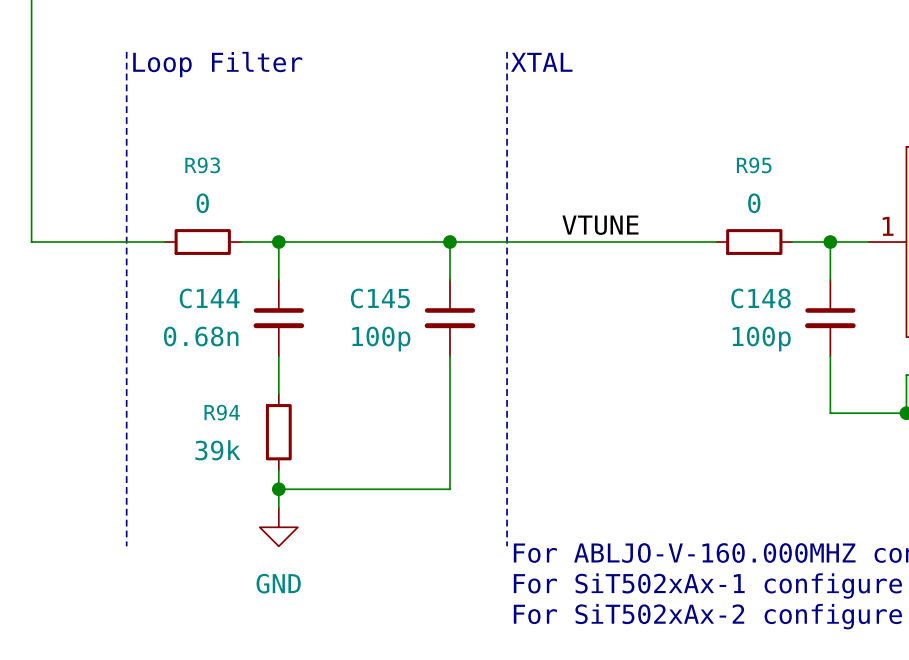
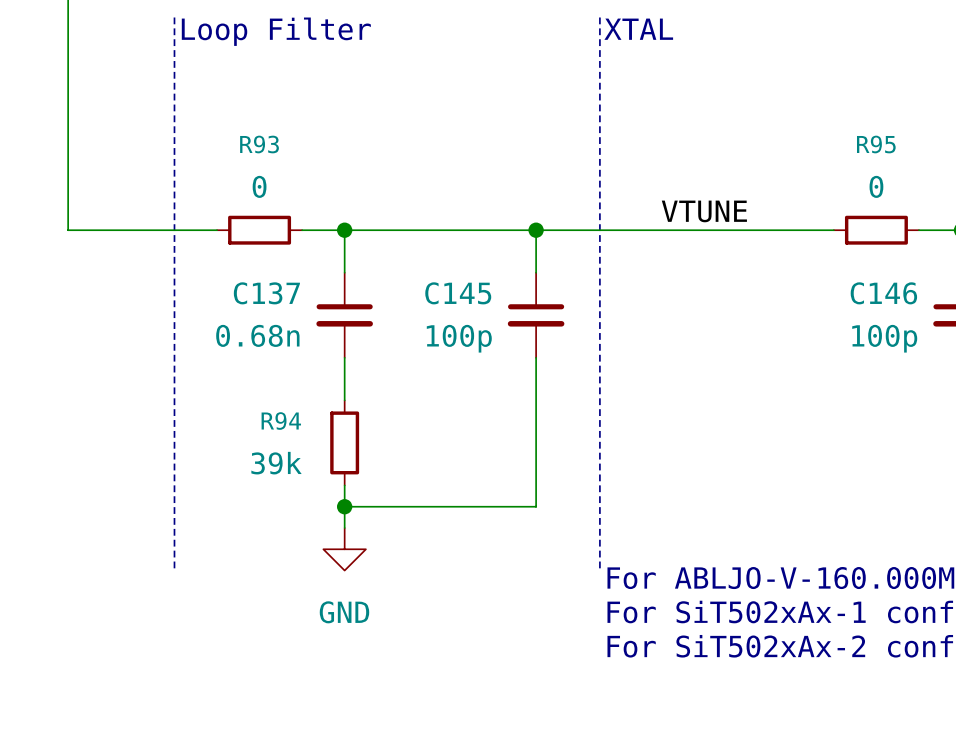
C144 name: C144 (209, 298) -> C137 (266, 293)
C148 name: C148 (760, 298) -> C146 (883, 293)

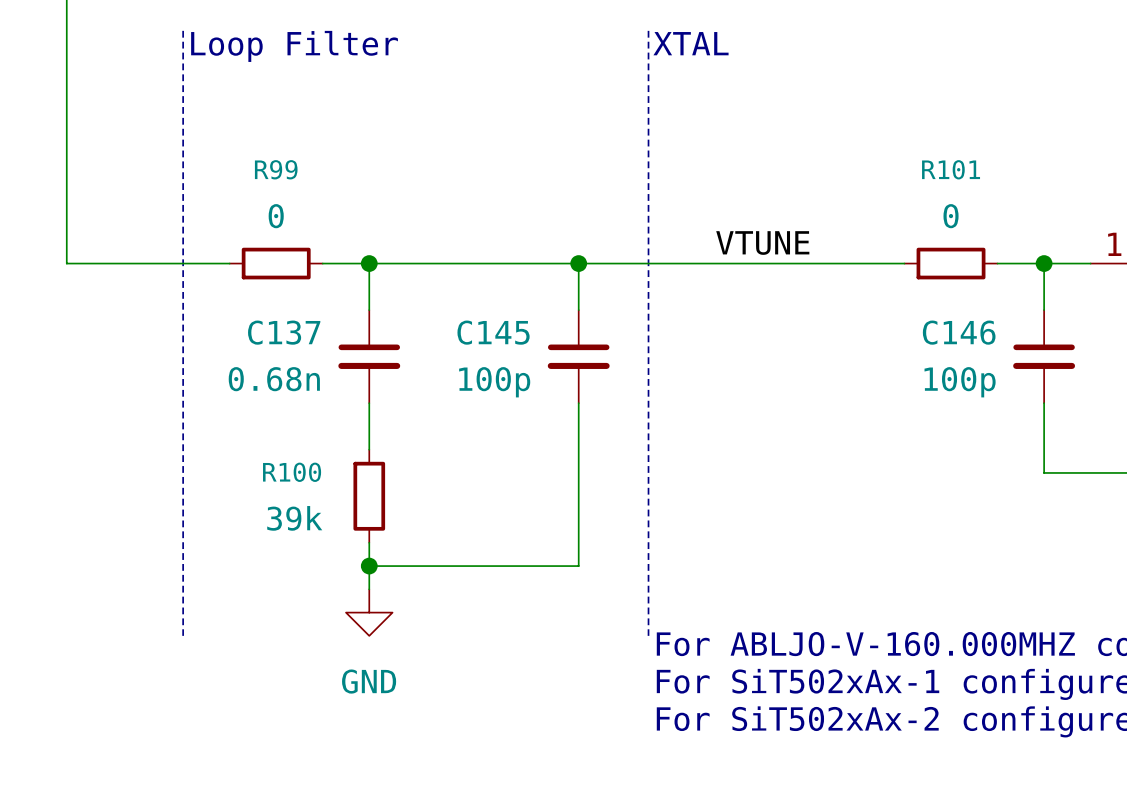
R93 name: R93 (259, 144) -> R99 (276, 169)
R95 name: R95 (876, 144) -> R101 (951, 169)
R94 name: R94 (281, 421) -> R100 (292, 472)

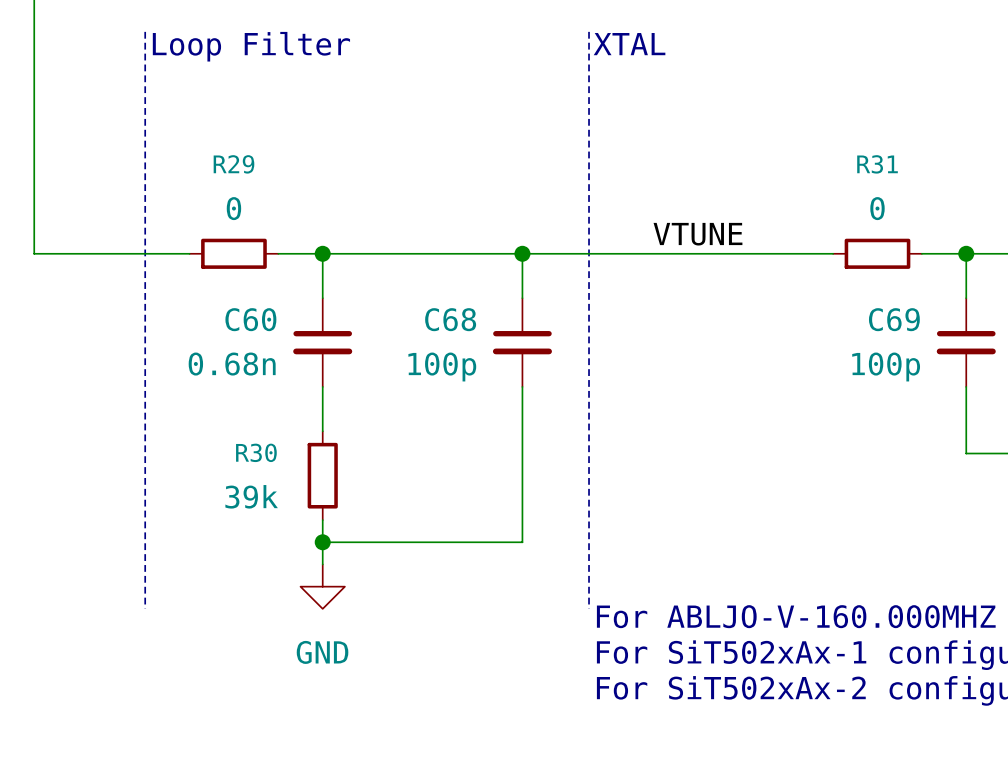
R99 name: R99 (276, 169) -> R29 (233, 164)
R101 name: R101 (951, 169) -> R31 (877, 164)
C137 name: C137 (284, 332) -> C60 (250, 319)
C145 name: C145 (493, 332) -> C68 (450, 319)
C146 name: C146 (959, 332) -> C69 (894, 319)
R100 name: R100 (292, 472) -> R30 (256, 452)

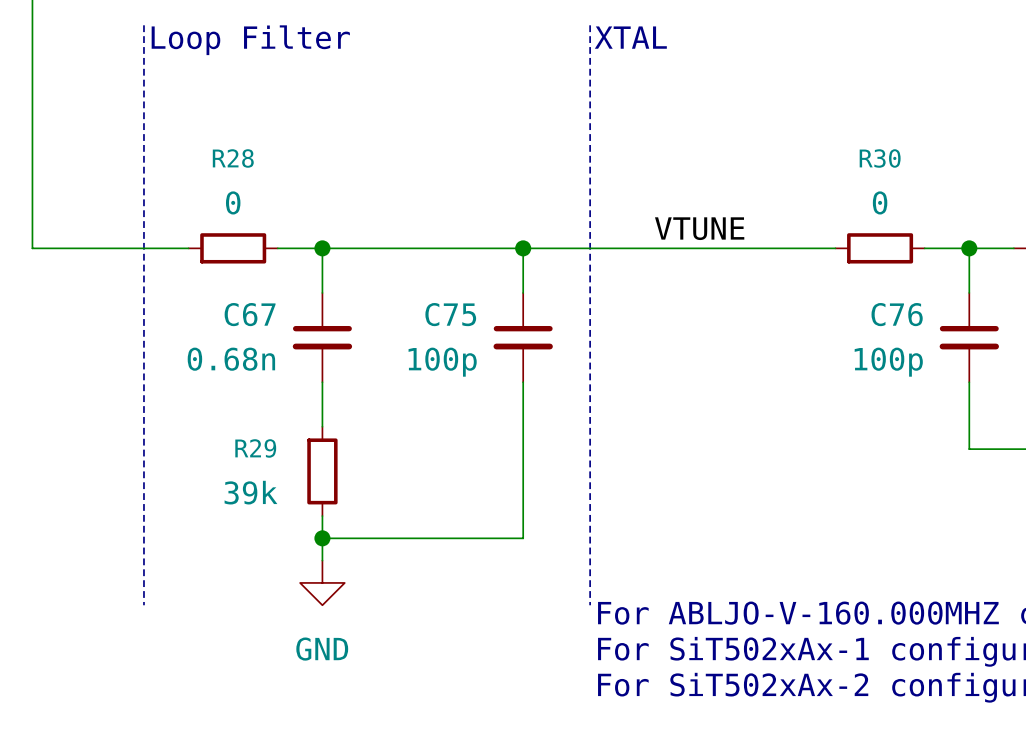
R29 name: R29 (233, 164) -> R28 (233, 158)
R31 name: R31 (877, 164) -> R30 (880, 158)
C60 name: C60 (250, 319) -> C67 (250, 314)
C68 name: C68 (450, 319) -> C75 (450, 314)
C69 name: C69 (894, 319) -> C76 (897, 314)
R30 name: R30 (256, 452) -> R29 (255, 448)

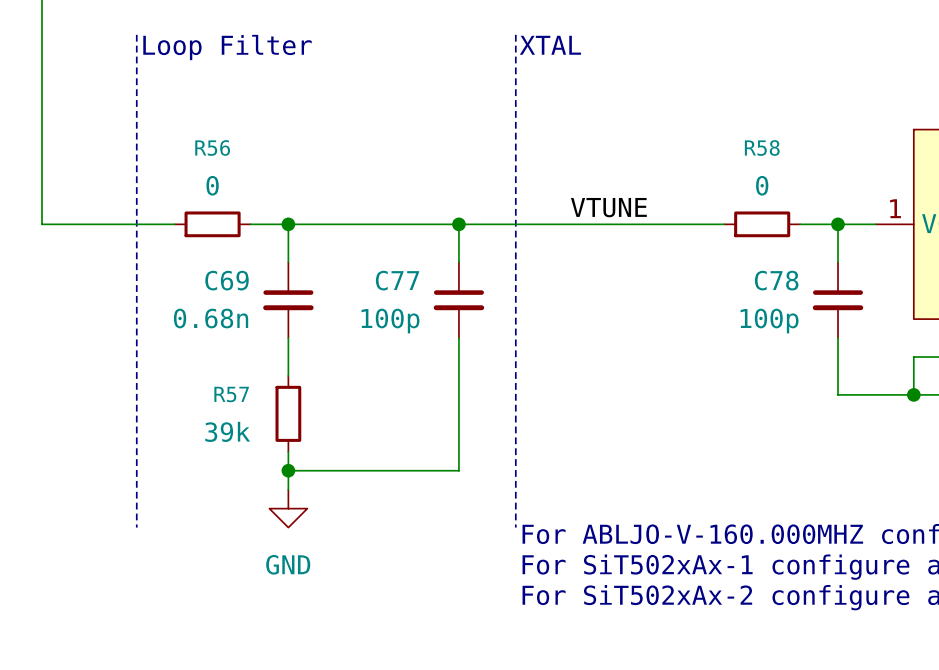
R28 name: R28 (233, 158) -> R56 (212, 147)
R30 name: R30 (880, 158) -> R58 (762, 147)
C67 name: C67 (250, 314) -> C69 (227, 280)
C75 name: C75 (450, 314) -> C77 (397, 280)
C76 name: C76 (897, 314) -> C78 (776, 280)
R29 name: R29 (255, 448) -> R57 (231, 394)

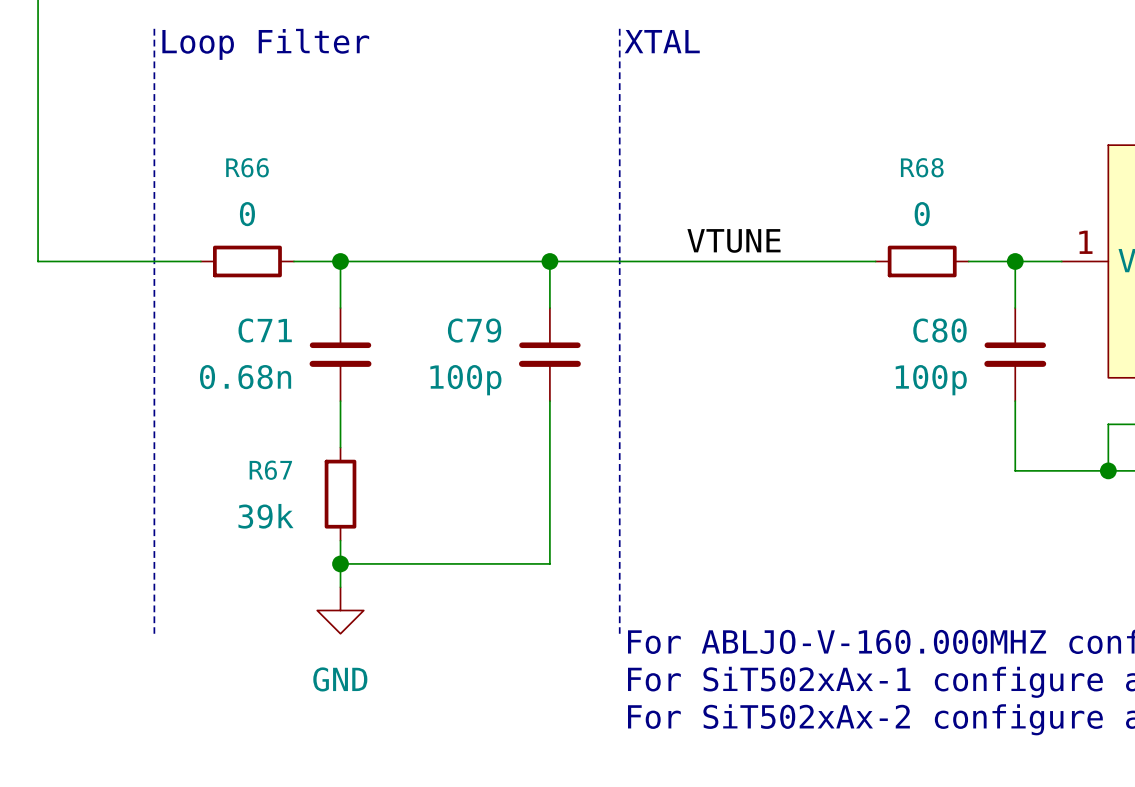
R56 name: R56 (212, 147) -> R66 (247, 167)
R58 name: R58 (762, 147) -> R68 (922, 167)
C69 name: C69 (227, 280) -> C71 (265, 330)
C77 name: C77 (397, 280) -> C79 (474, 330)
C78 name: C78 (776, 280) -> C80 (939, 330)
R57 name: R57 (231, 394) -> R67 (270, 470)

